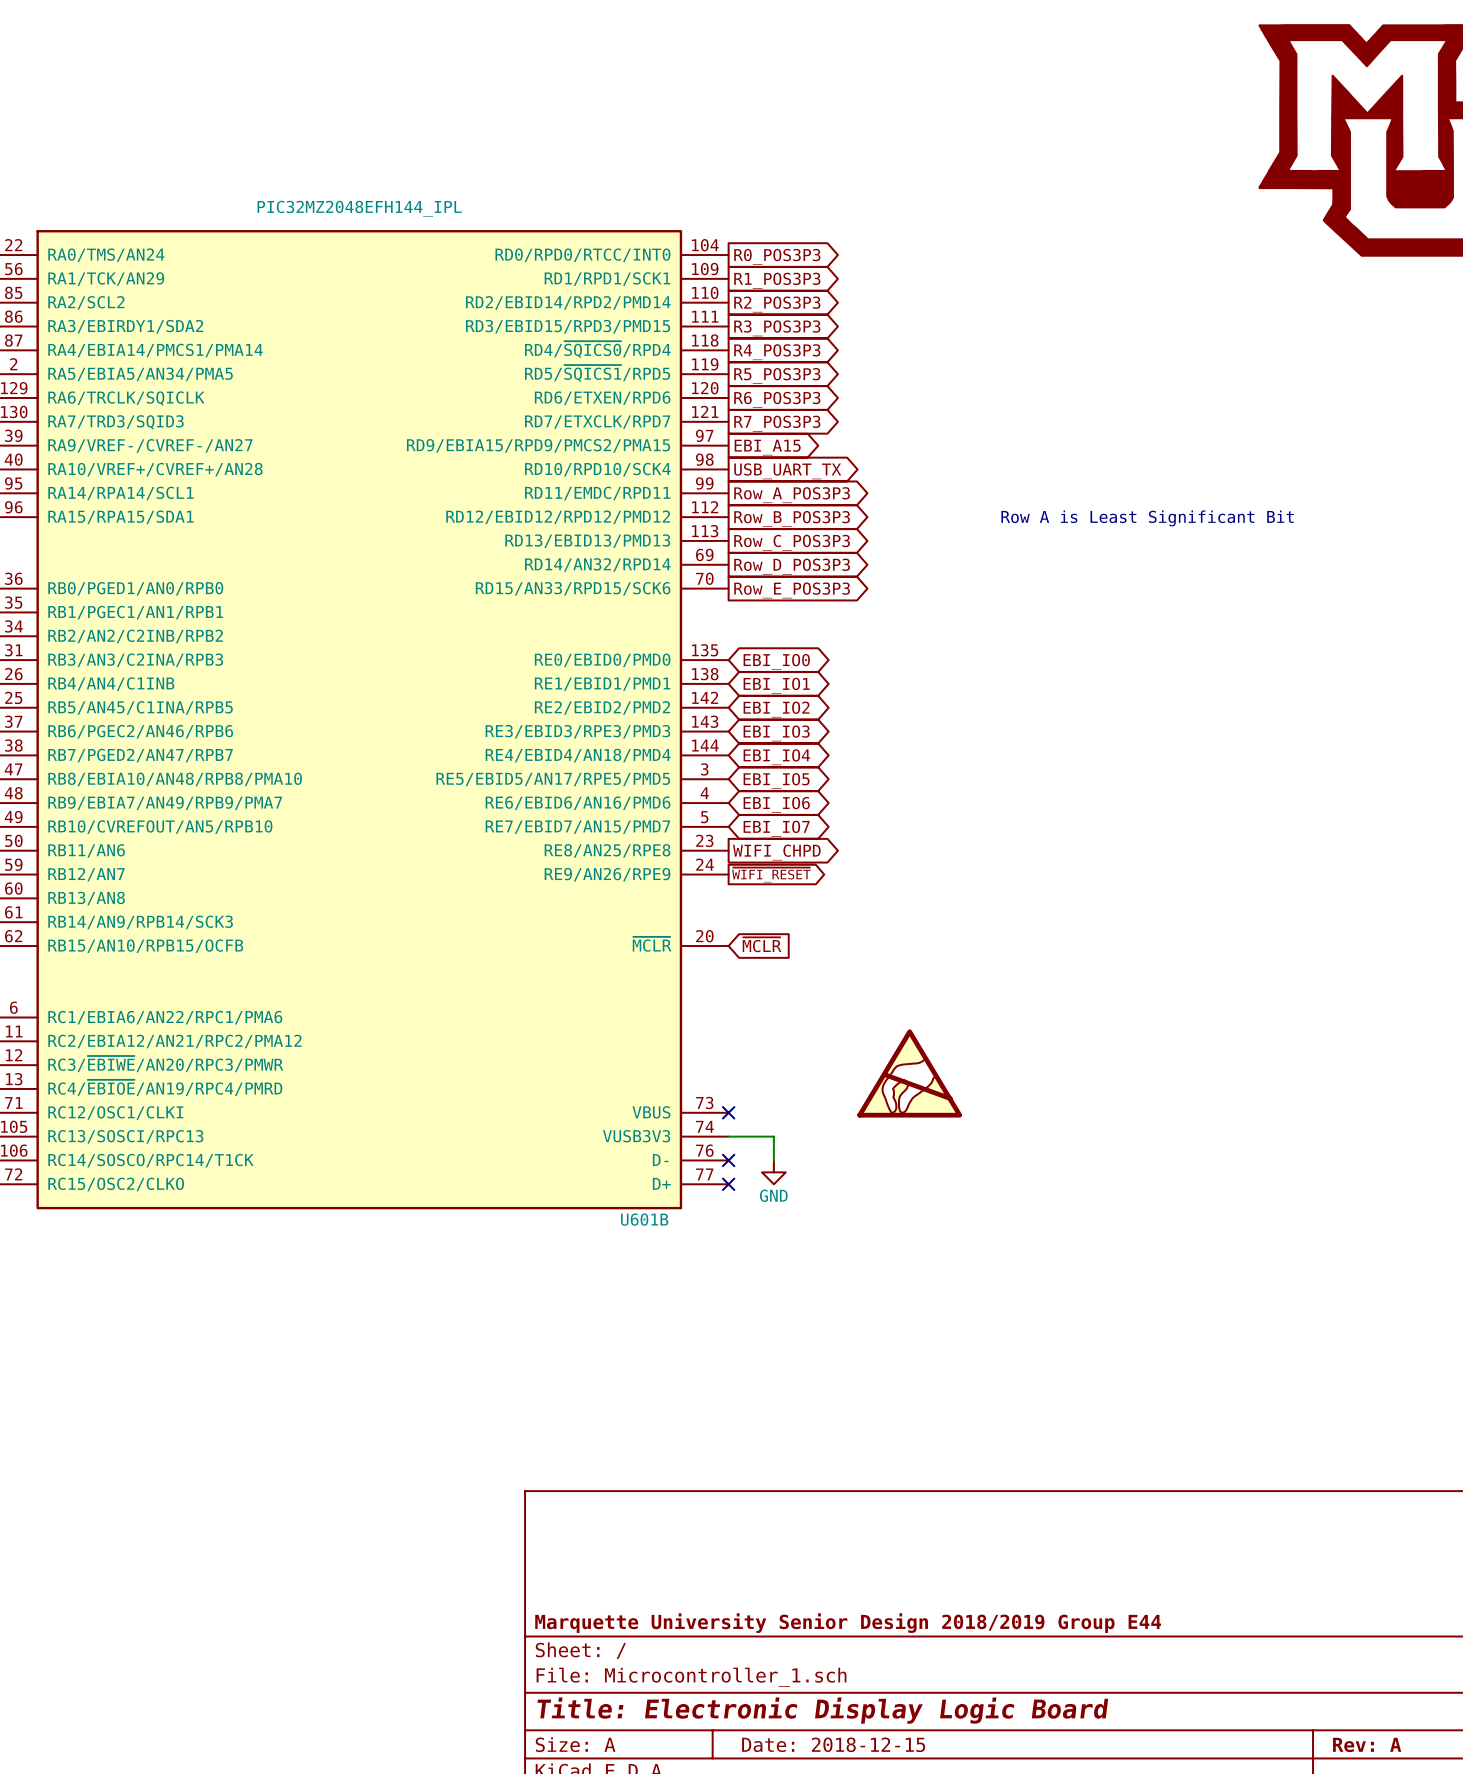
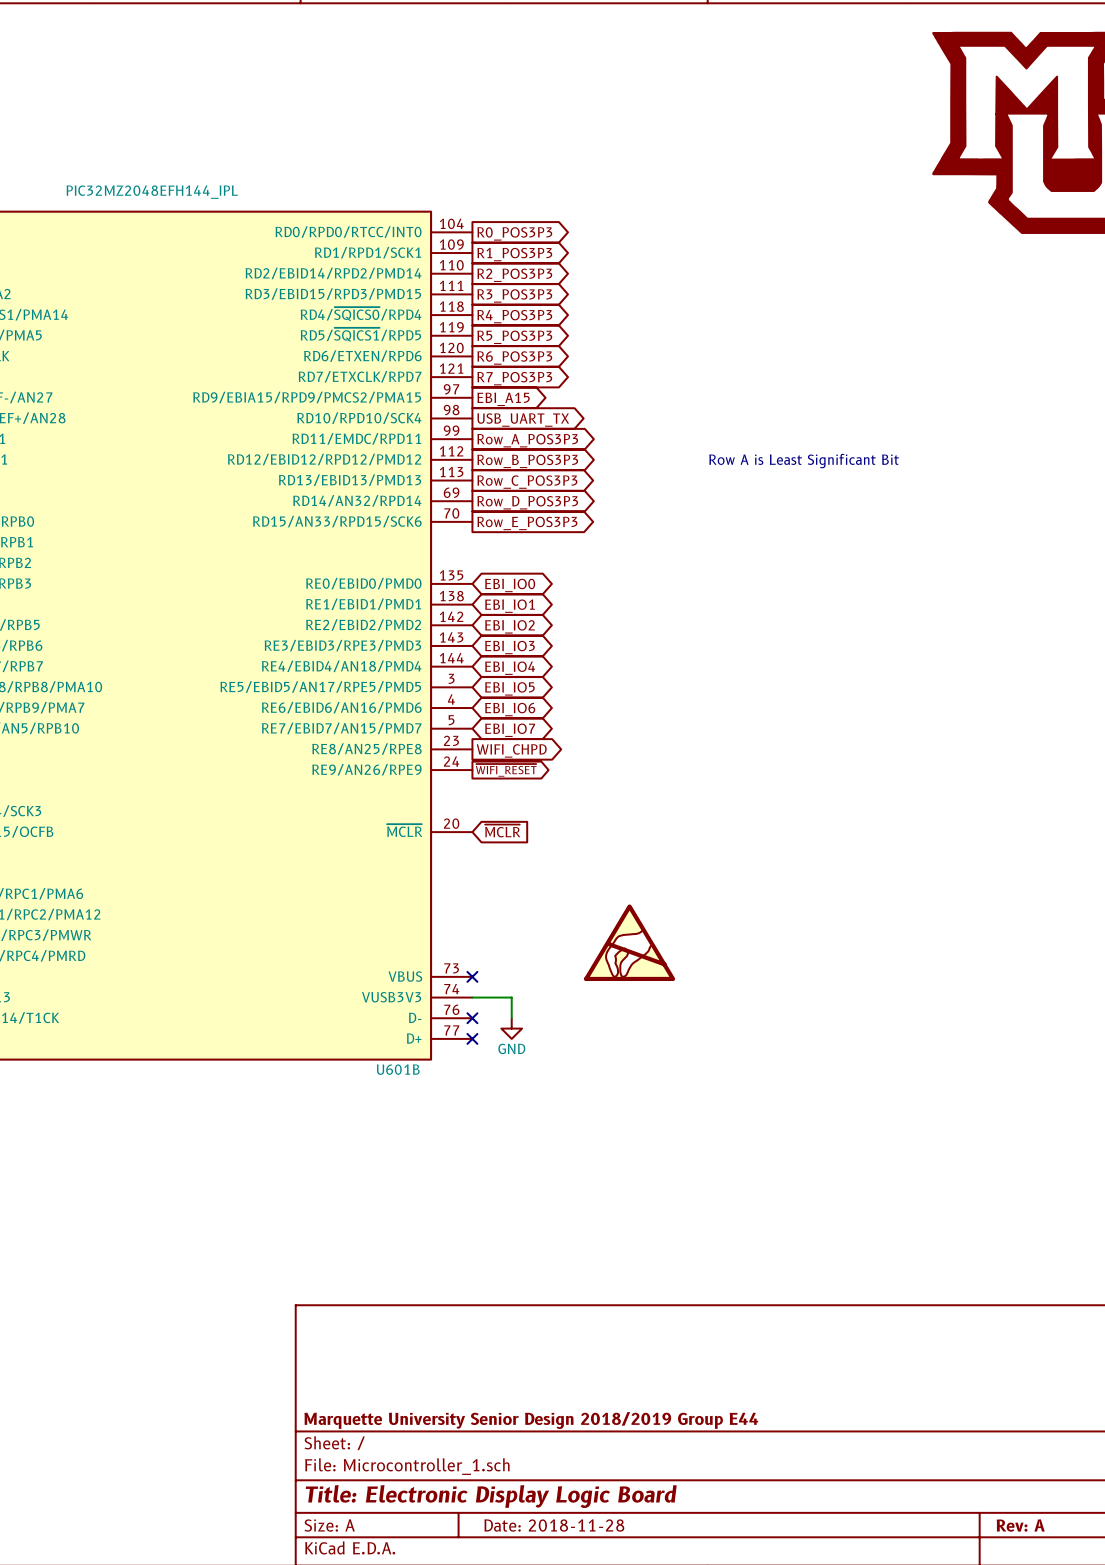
title block: Date: 2018-12-15 (833, 1744) -> Date: 2018-11-28 (554, 1525)

